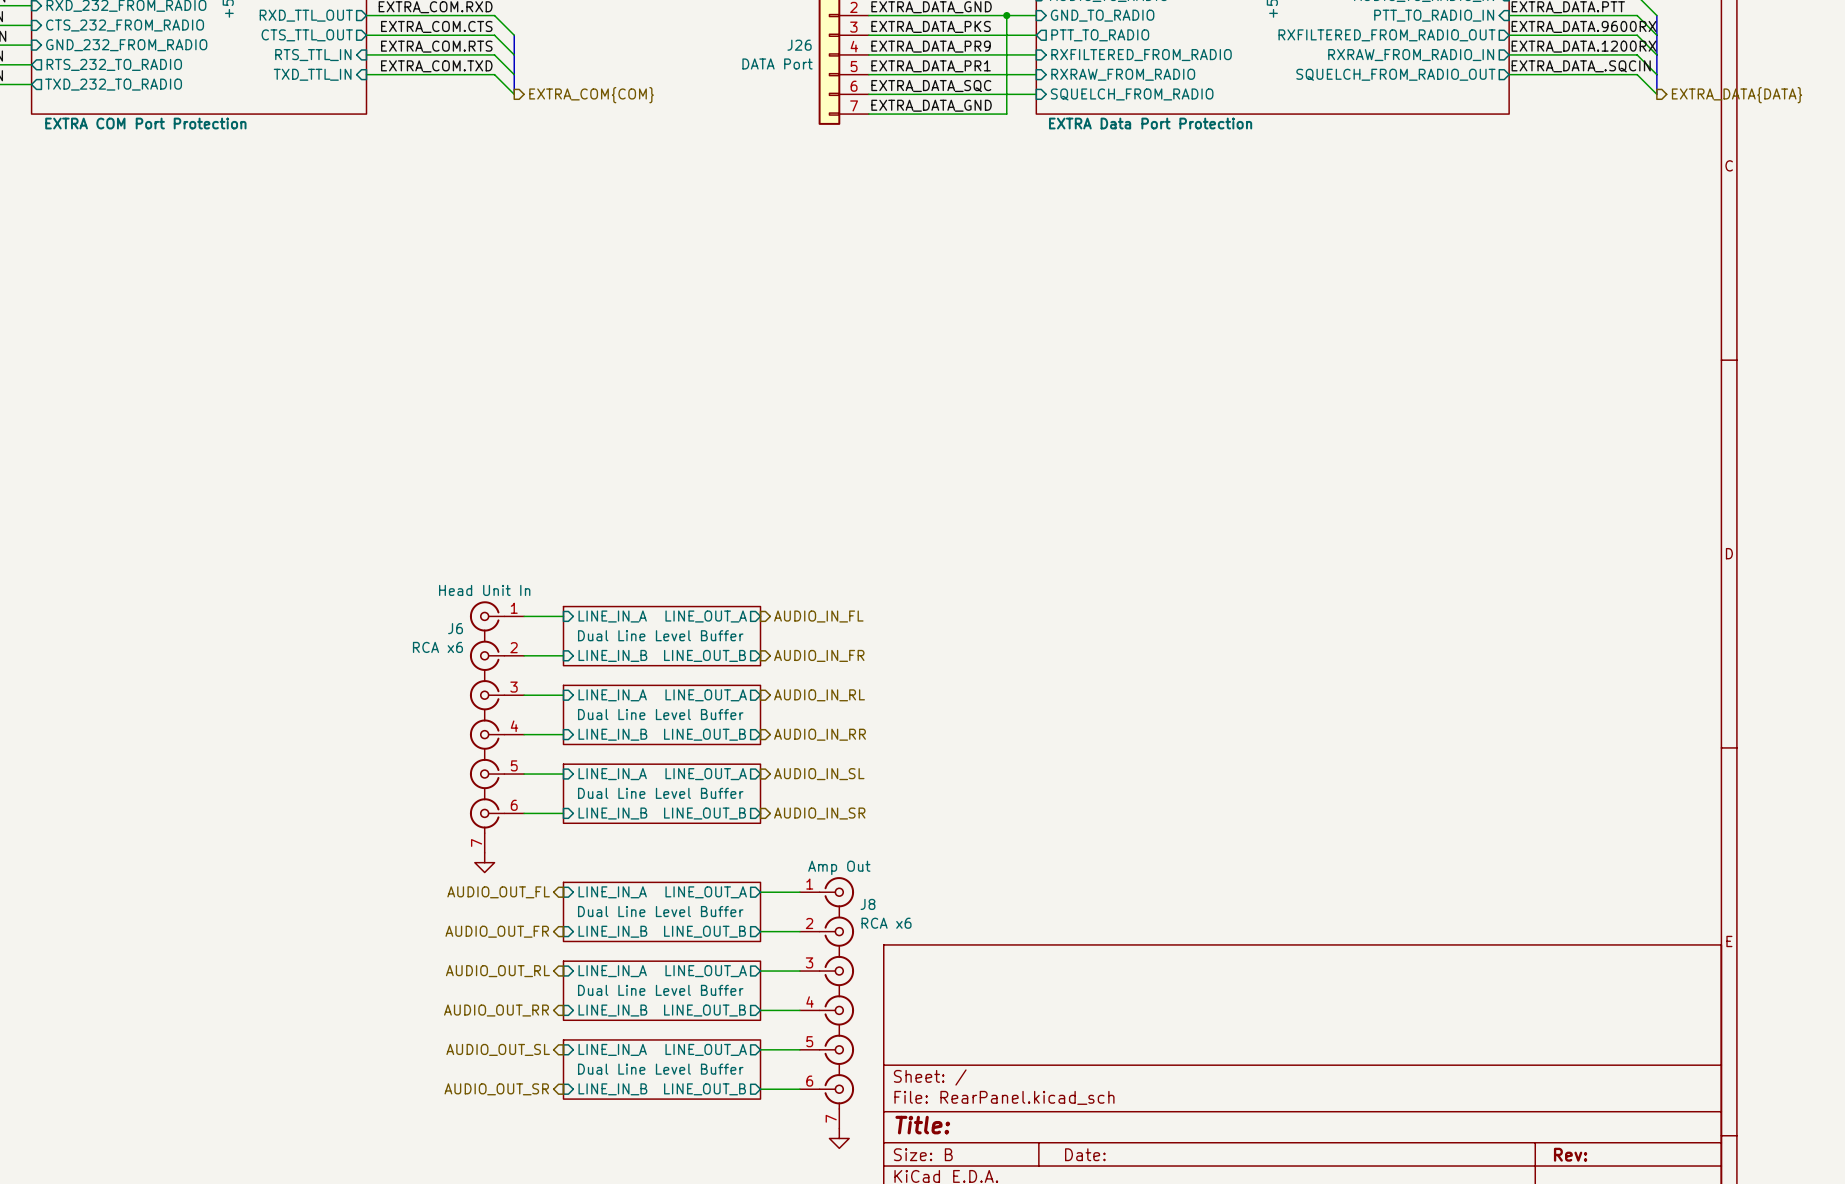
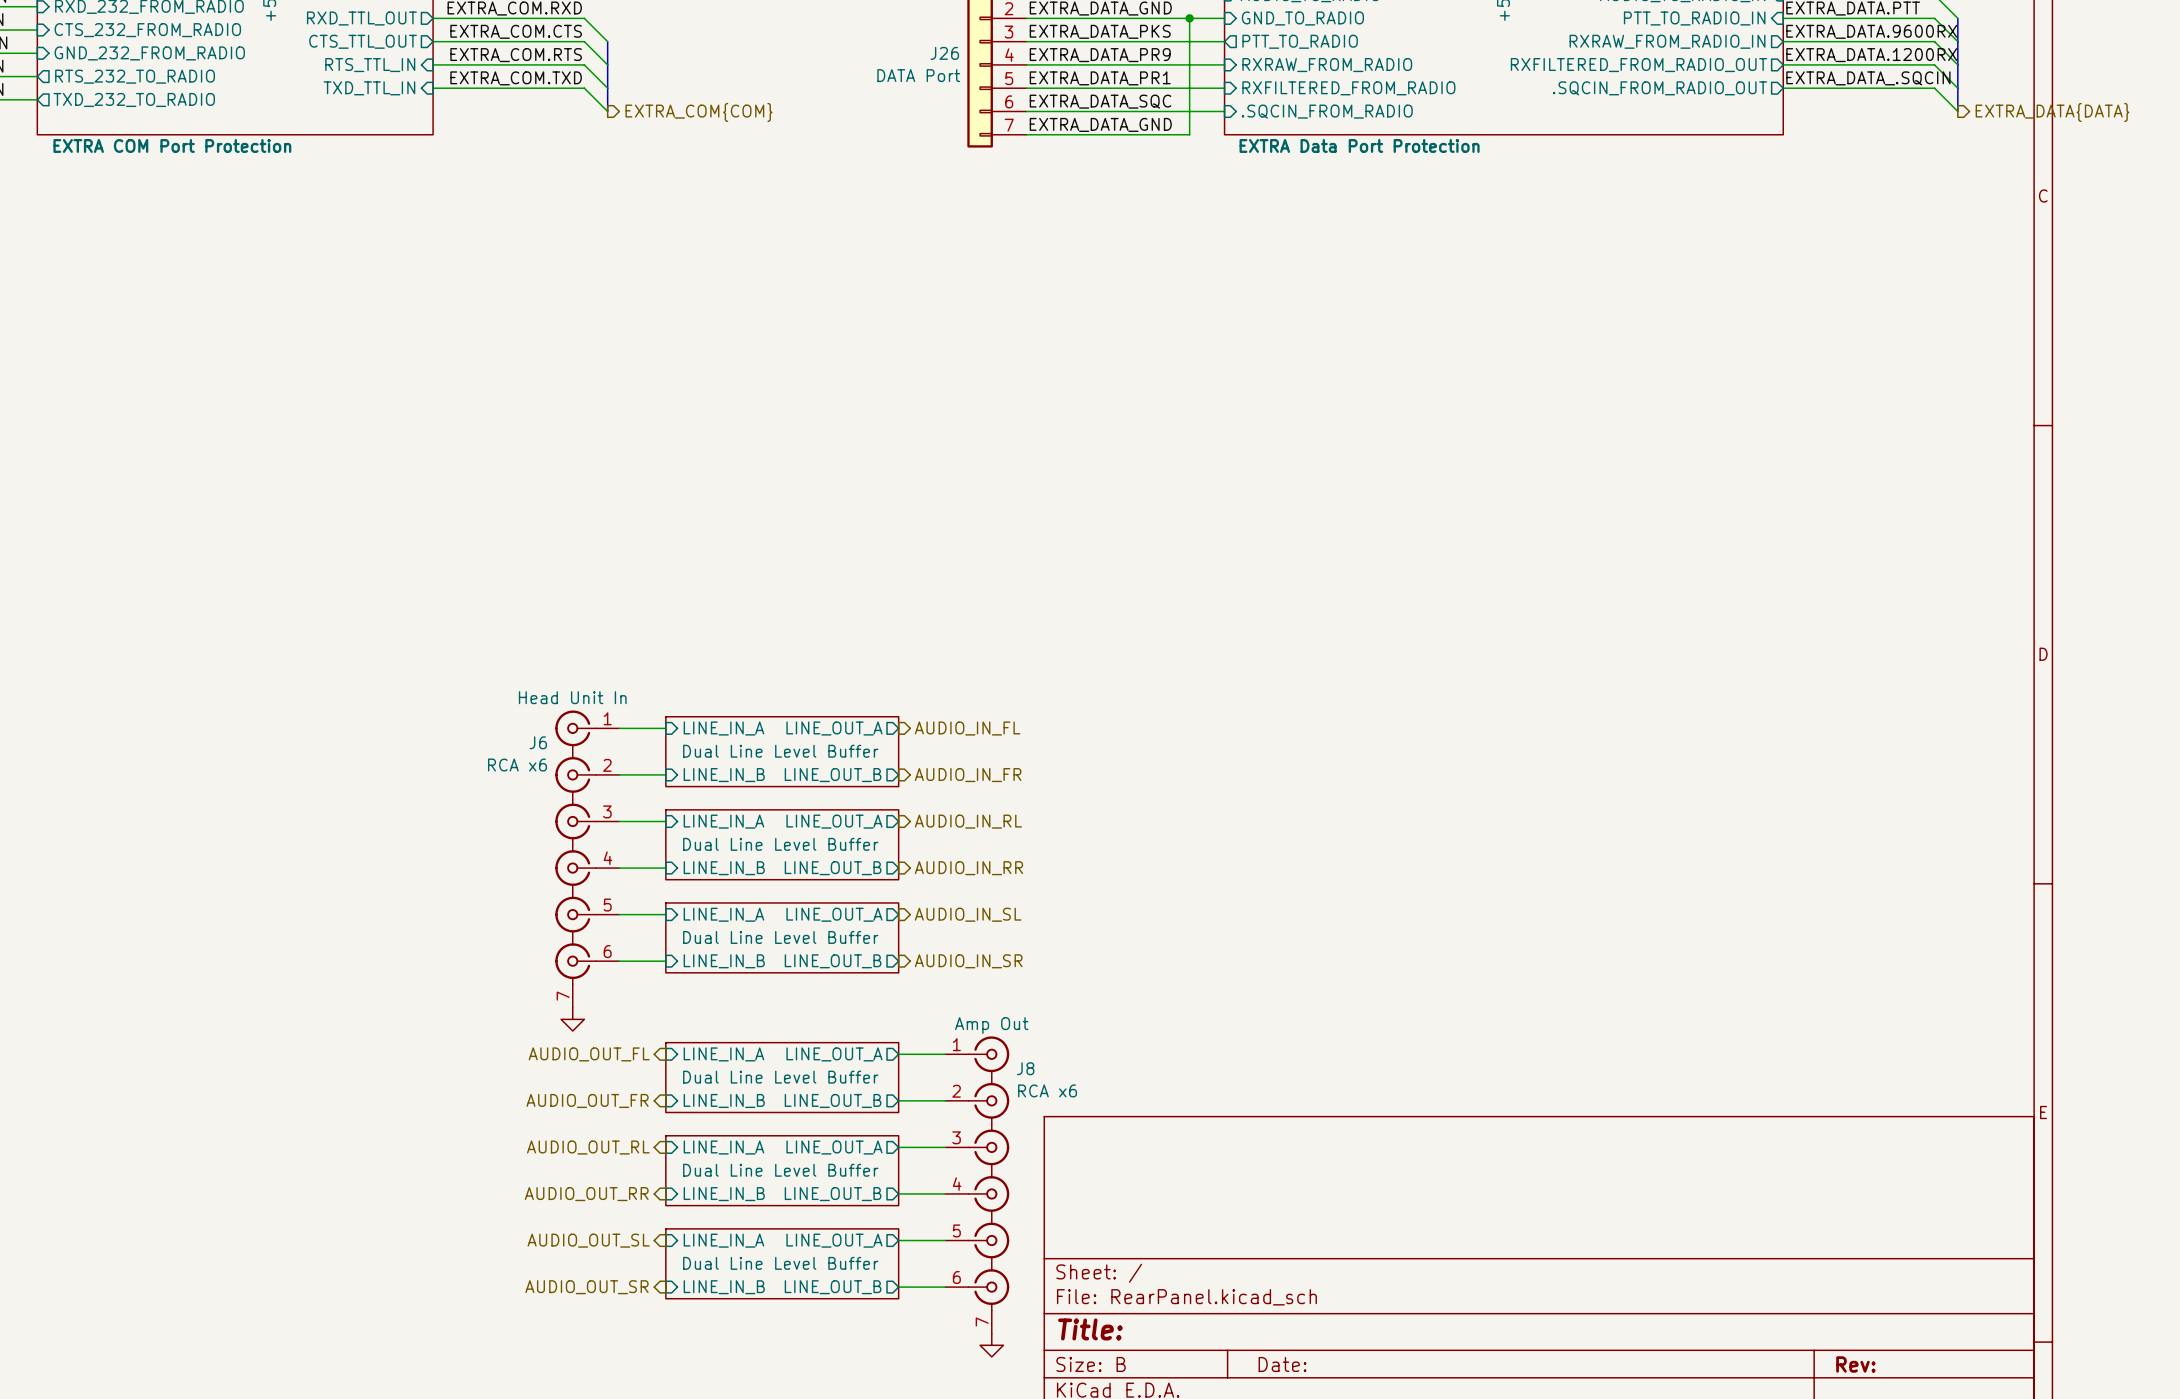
sheet pin: RXFILTERED_FROM_RADIO_OUT (1387, 35) -> RXRAW_FROM_RADIO_IN (1667, 41)
sheet pin: RXFILTERED_FROM_RADIO (1141, 55) -> RXRAW_FROM_RADIO (1327, 65)
sheet pin: RXRAW_FROM_RADIO_IN (1411, 55) -> RXFILTERED_FROM_RADIO_OUT (1638, 65)
sheet pin: RXRAW_FROM_RADIO (1123, 74) -> RXFILTERED_FROM_RADIO (1348, 88)
sheet pin: SQUELCH_FROM_RADIO_OUT (1395, 74) -> .SQCIN_FROM_RADIO_OUT (1660, 88)
sheet pin: SQUELCH_FROM_RADIO (1132, 94) -> .SQCIN_FROM_RADIO (1327, 111)

